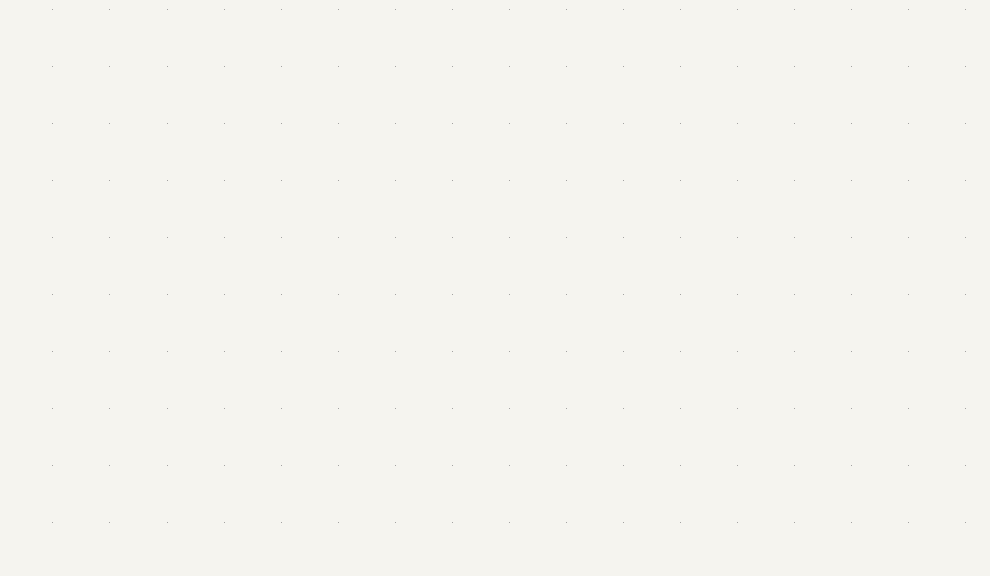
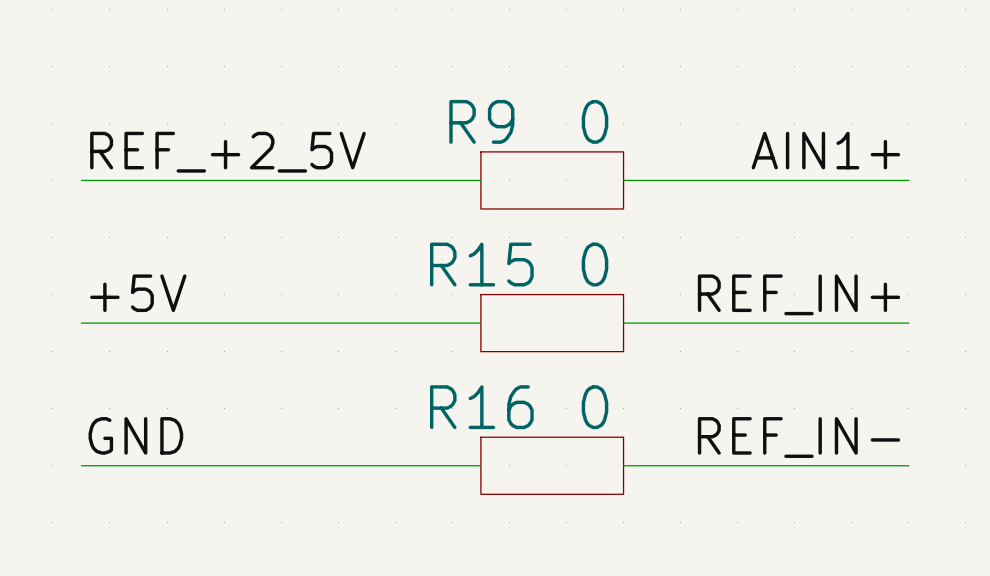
label: none -> AIN1+ (825, 150)
label: none -> REF_+2_5V (227, 152)
wire: none -> (81, 180) (480, 180)
R9: none -> 0 (552, 180)
wire: none -> (623, 180) (908, 180)
label: none -> +5V (138, 293)
label: none -> REF_IN+ (798, 294)
wire: none -> (81, 323) (480, 323)
R15: none -> 0 (552, 323)
wire: none -> (623, 323) (908, 323)
label: none -> GND (135, 435)
label: none -> REF_IN- (798, 437)
wire: none -> (81, 465) (480, 465)
R16: none -> 0 (552, 465)
wire: none -> (623, 465) (908, 465)

